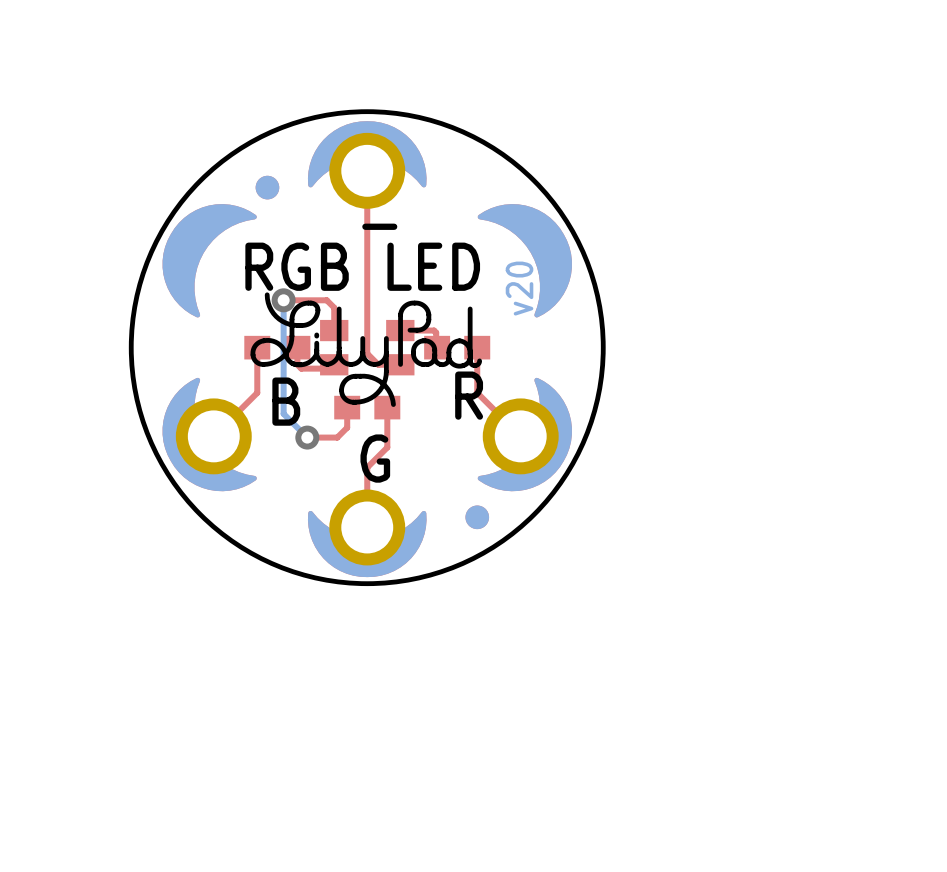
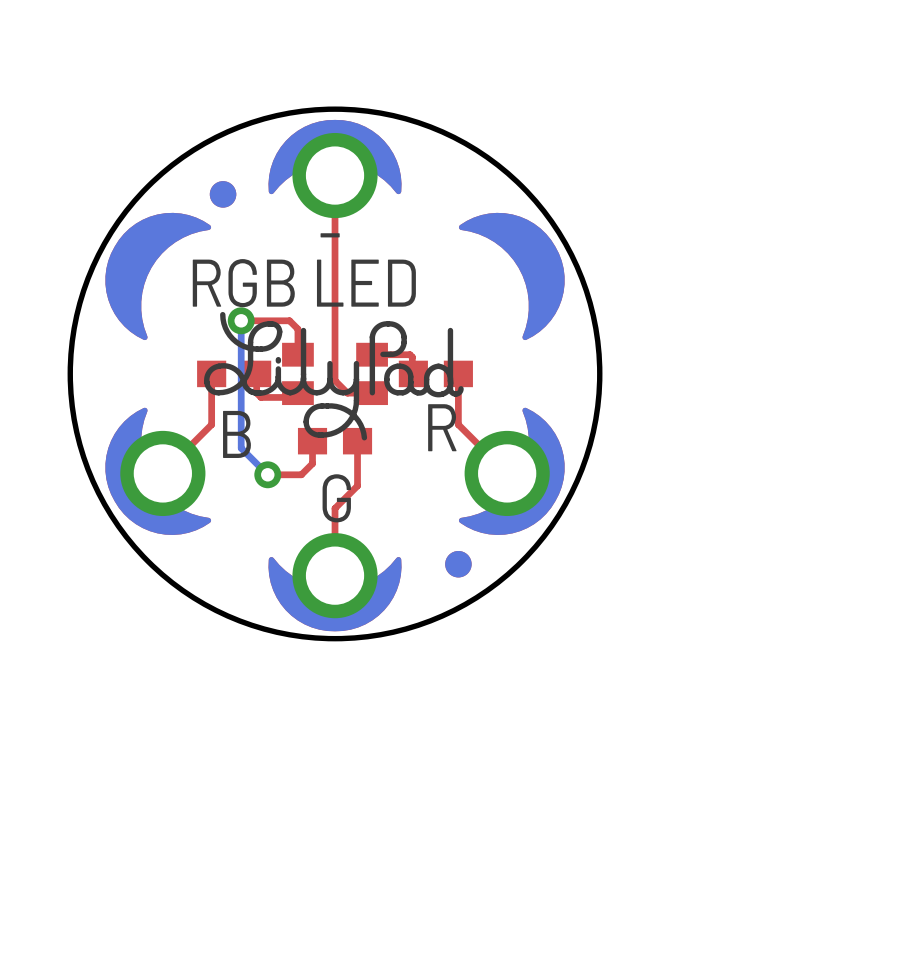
text: v20 (519, 288) -> none

